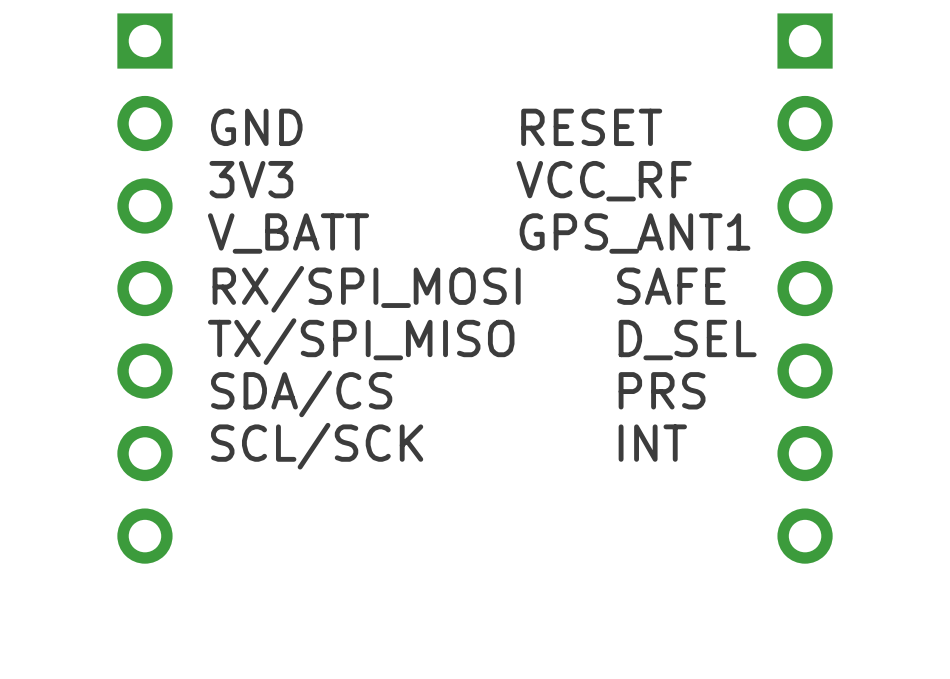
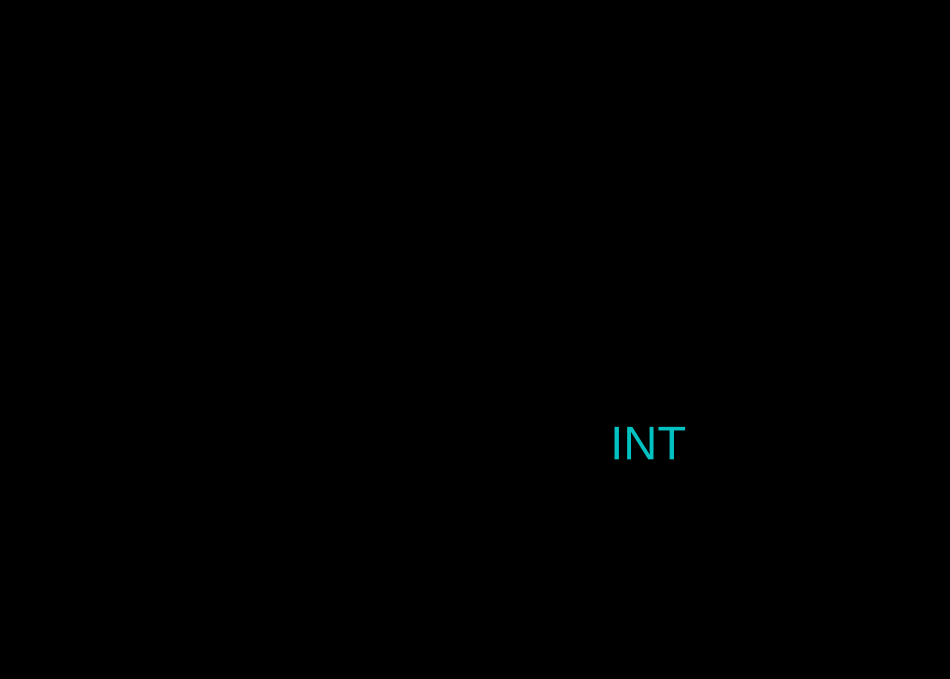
text: GND (256, 127) -> none
text: RESET (591, 127) -> none
text: 3V3 (251, 179) -> none
text: VCC_RF (604, 181) -> none
text: V_BATT (288, 233) -> none
text: GPS_ANT1 (635, 233) -> none
text: SAFE (671, 286) -> none
part: (144, 288) -> none
part: (805, 288) -> none
text: RX/SPI_MOSI (366, 289) -> none
text: D_SEL (687, 340) -> none
text: TX/SPI_MISO (361, 341) -> none
text: PRS (662, 390) -> none
text: SDA/CS (301, 393) -> none
text: SCL/SCK (317, 446) -> none

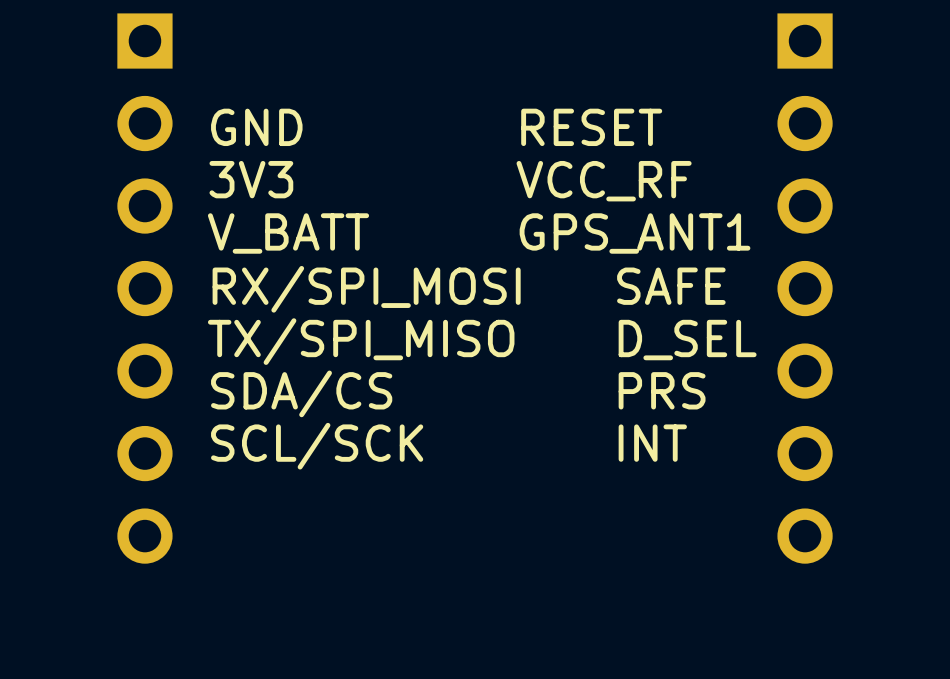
text: none -> GND (256, 127)
text: none -> RESET (591, 127)
text: none -> 3V3 (251, 179)
text: none -> VCC_RF (604, 181)
text: none -> V_BATT (288, 233)
text: none -> GPS_ANT1 (635, 233)
text: none -> SAFE (671, 286)
part: none -> (144, 288)
part: none -> (805, 288)
text: none -> RX/SPI_MOSI (366, 289)
text: none -> TX/SPI_MISO (361, 341)
text: none -> D_SEL (687, 340)
text: none -> SDA/CS (301, 393)
text: none -> PRS (662, 390)
text: none -> SCL/SCK (317, 446)

